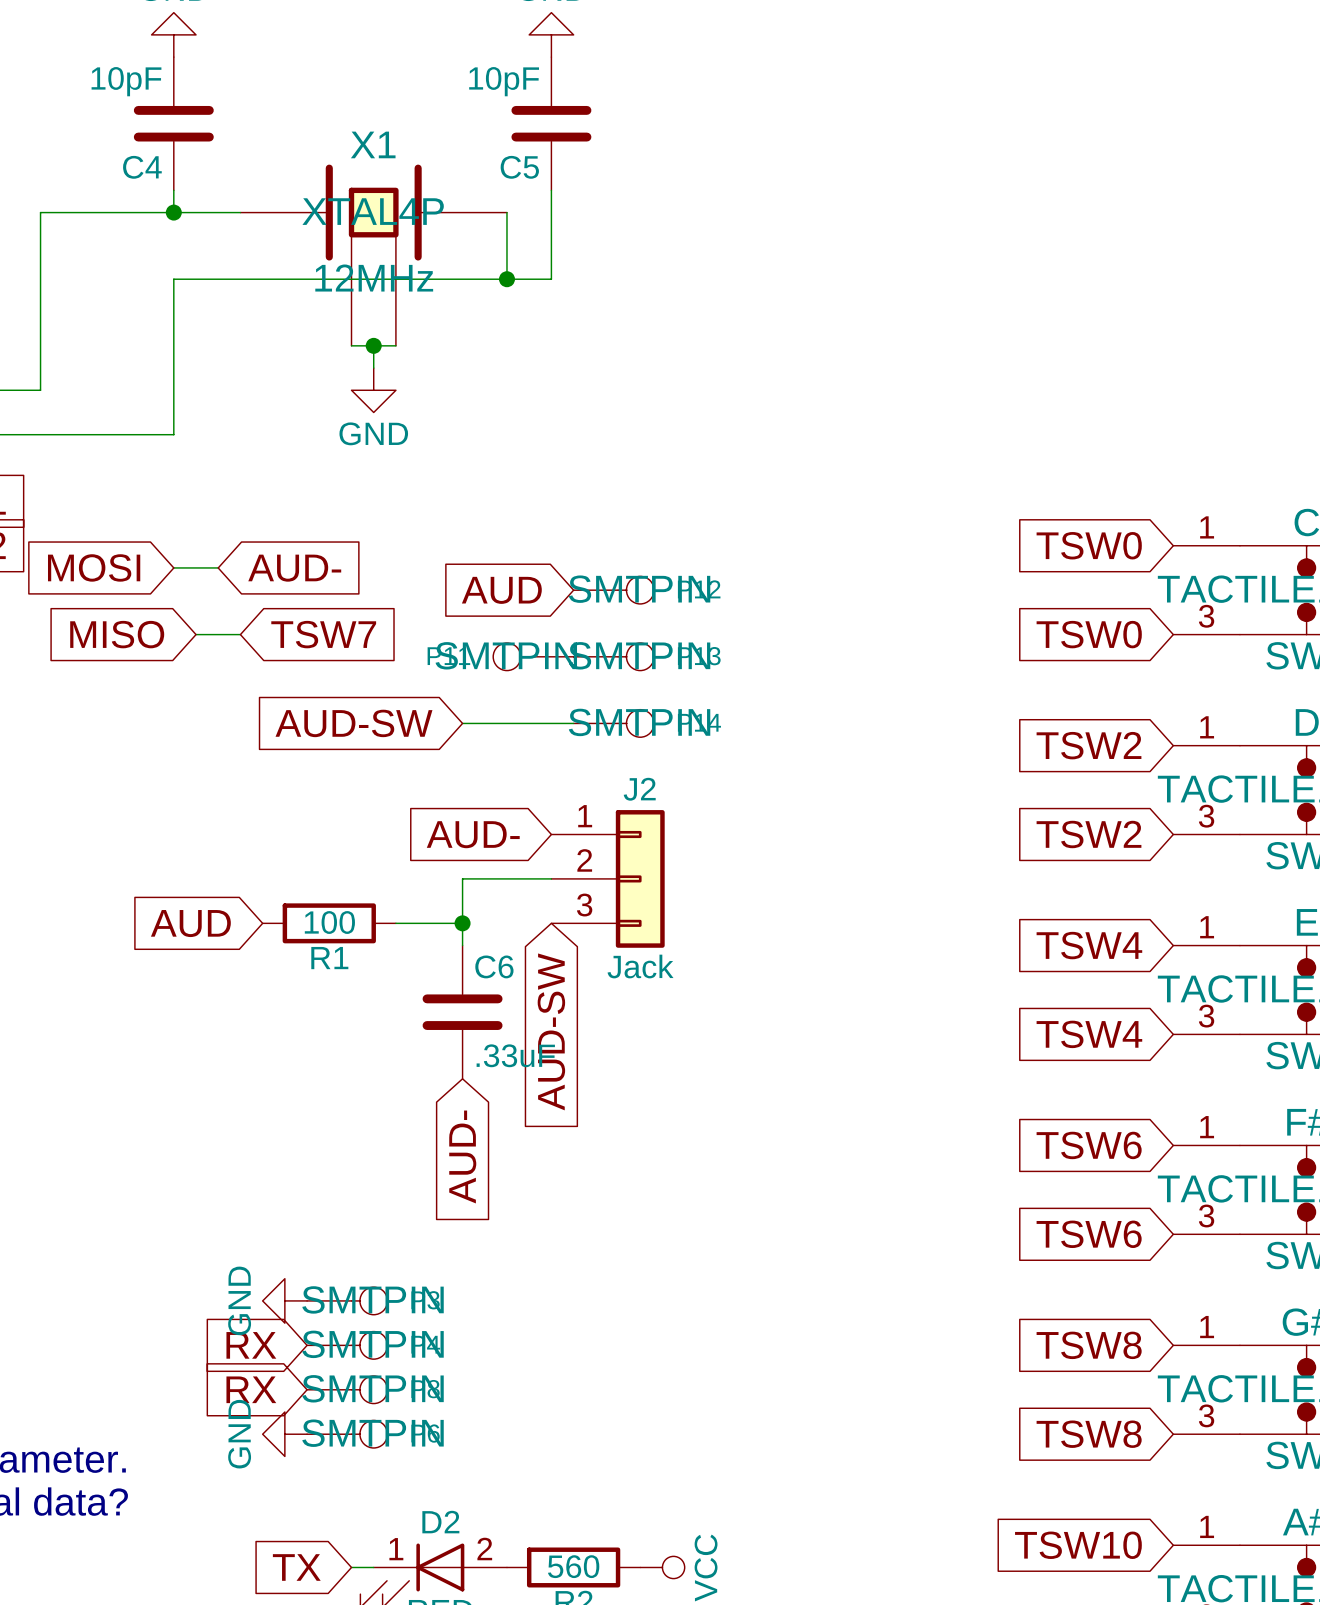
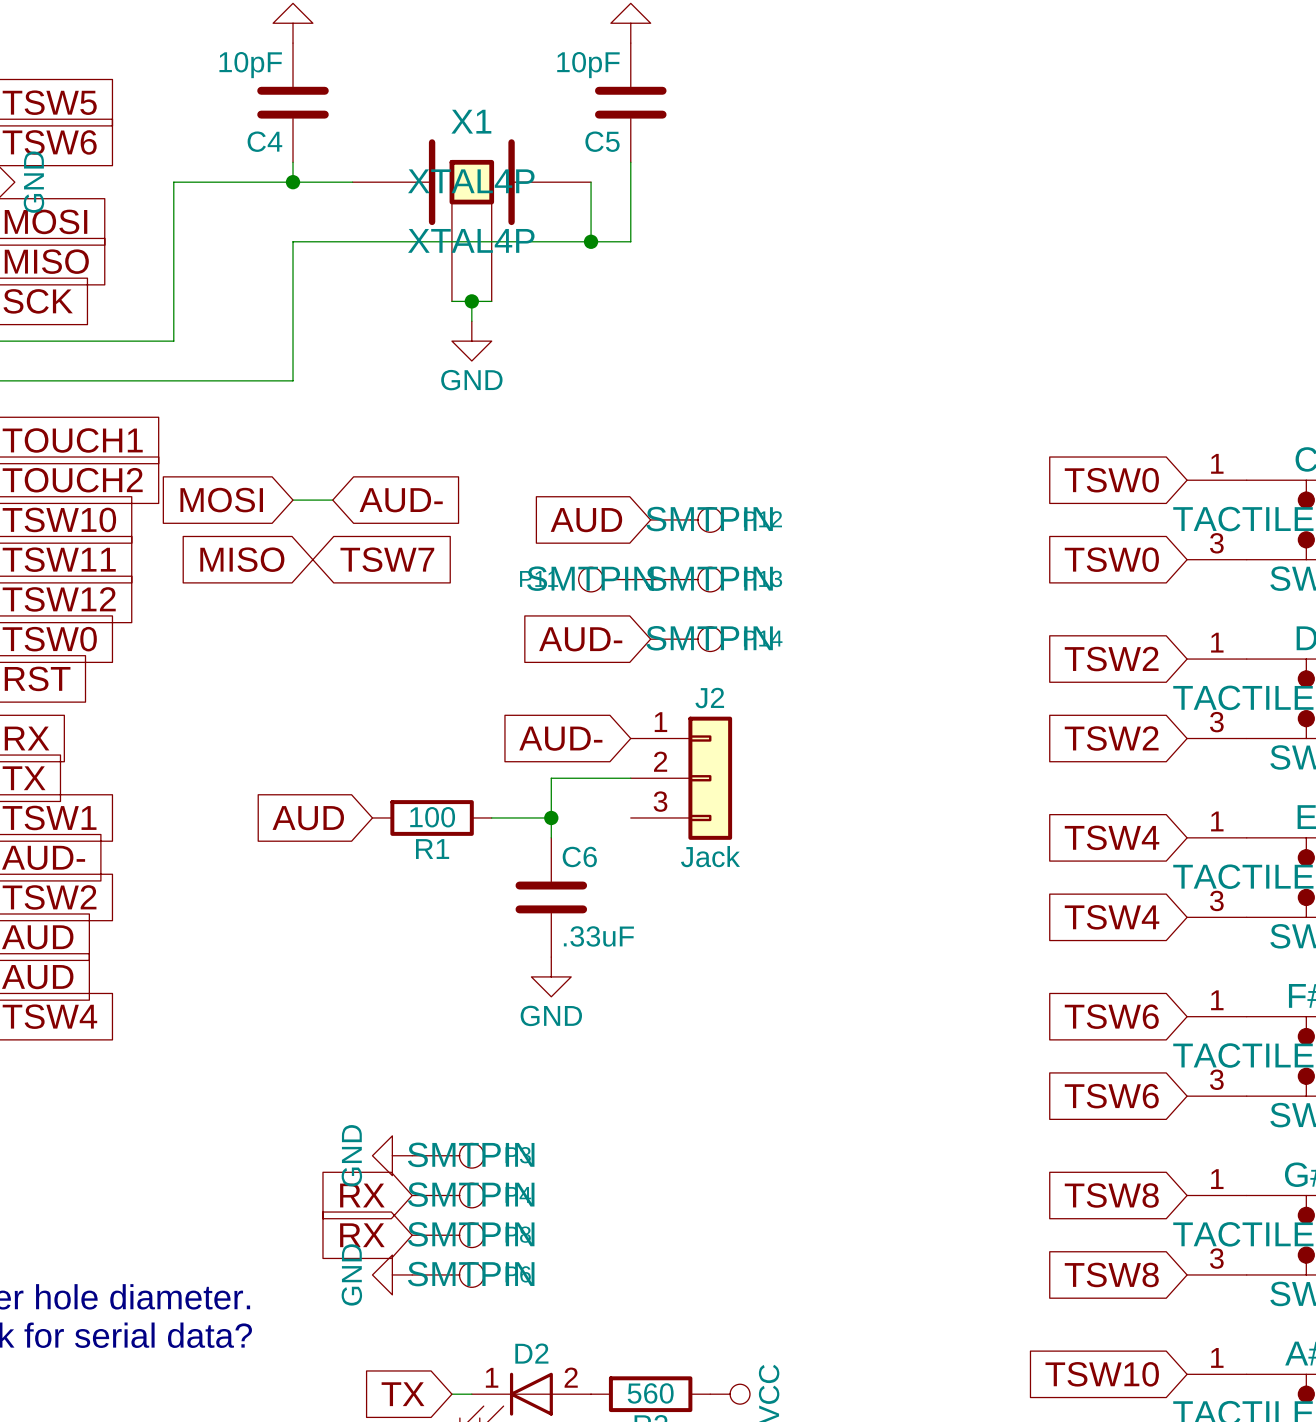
X1 value: 12MHz (374, 278) -> XTAL4P (471, 240)
wire: (196, 634) (240, 634) -> none
global label position: TSW7 (323, 634) -> TSW7 (387, 559)
global label: AUD-SW (353, 723) -> none
wire: (462, 723) (573, 723) -> none
global label: AUD-SW (551, 1031) -> none
power symbol: none -> GND (551, 976)
global label rotation: 0° (462, 1156) -> 90° clockwise (580, 639)
global label position: AUD- (462, 1156) -> AUD- (580, 639)

